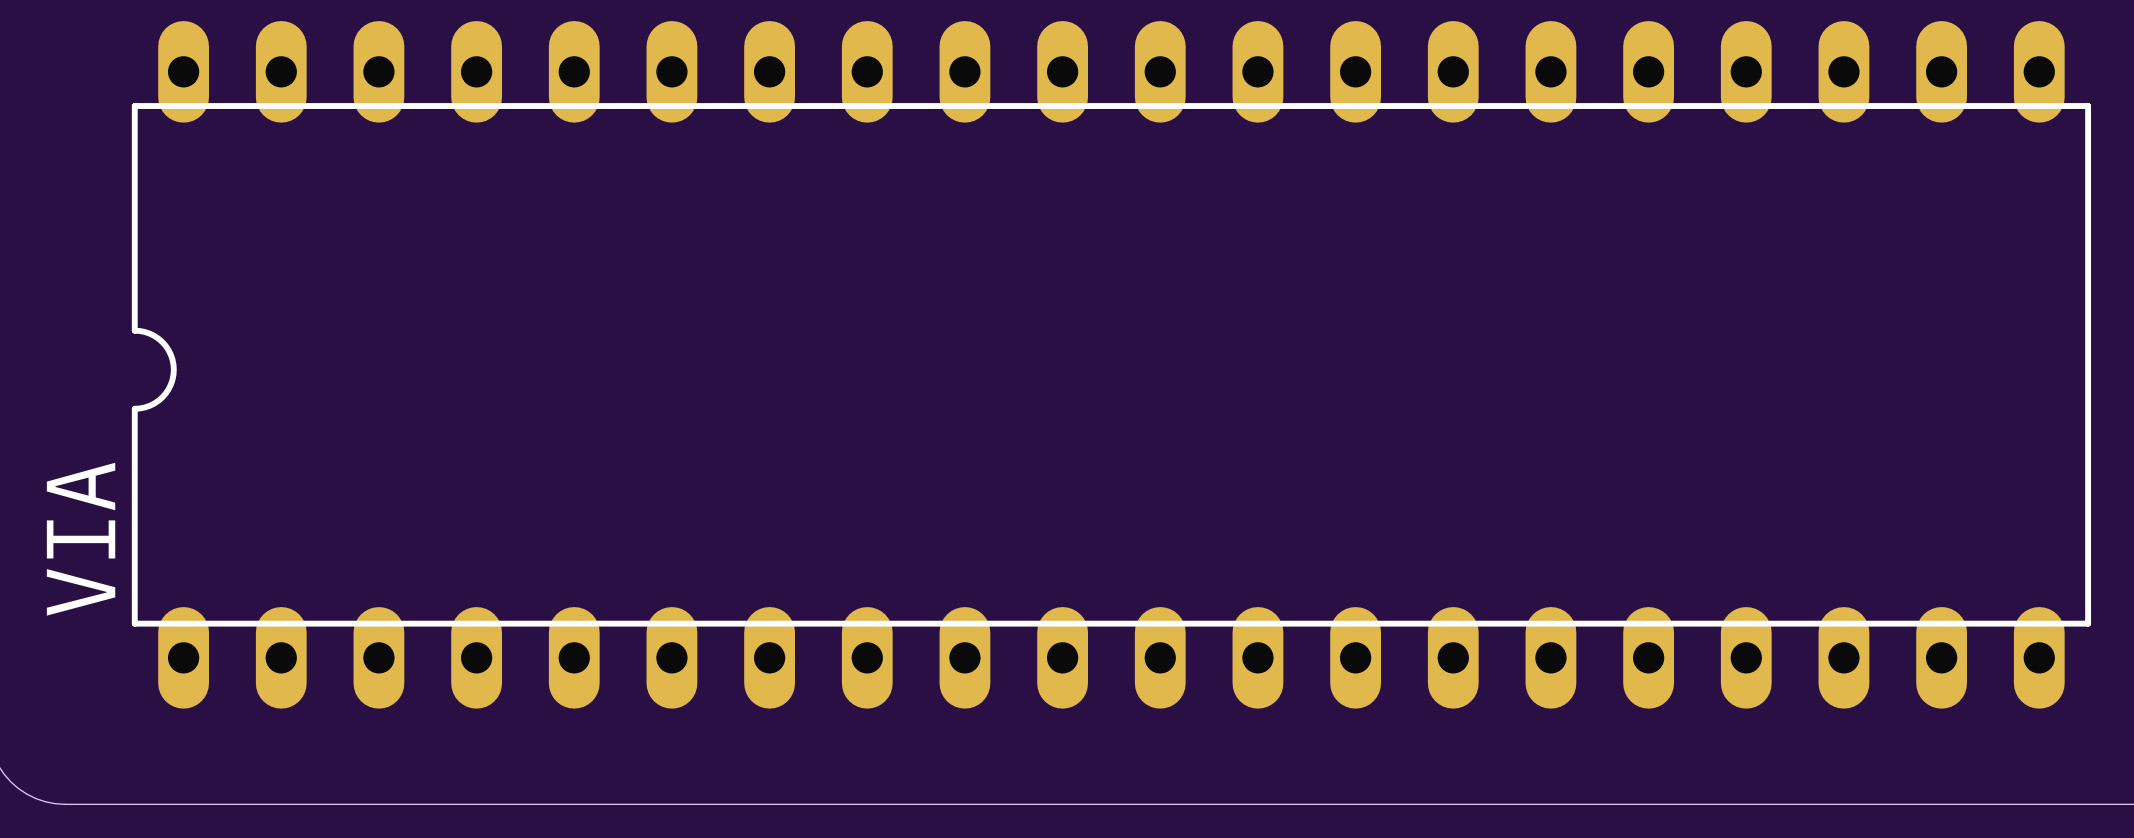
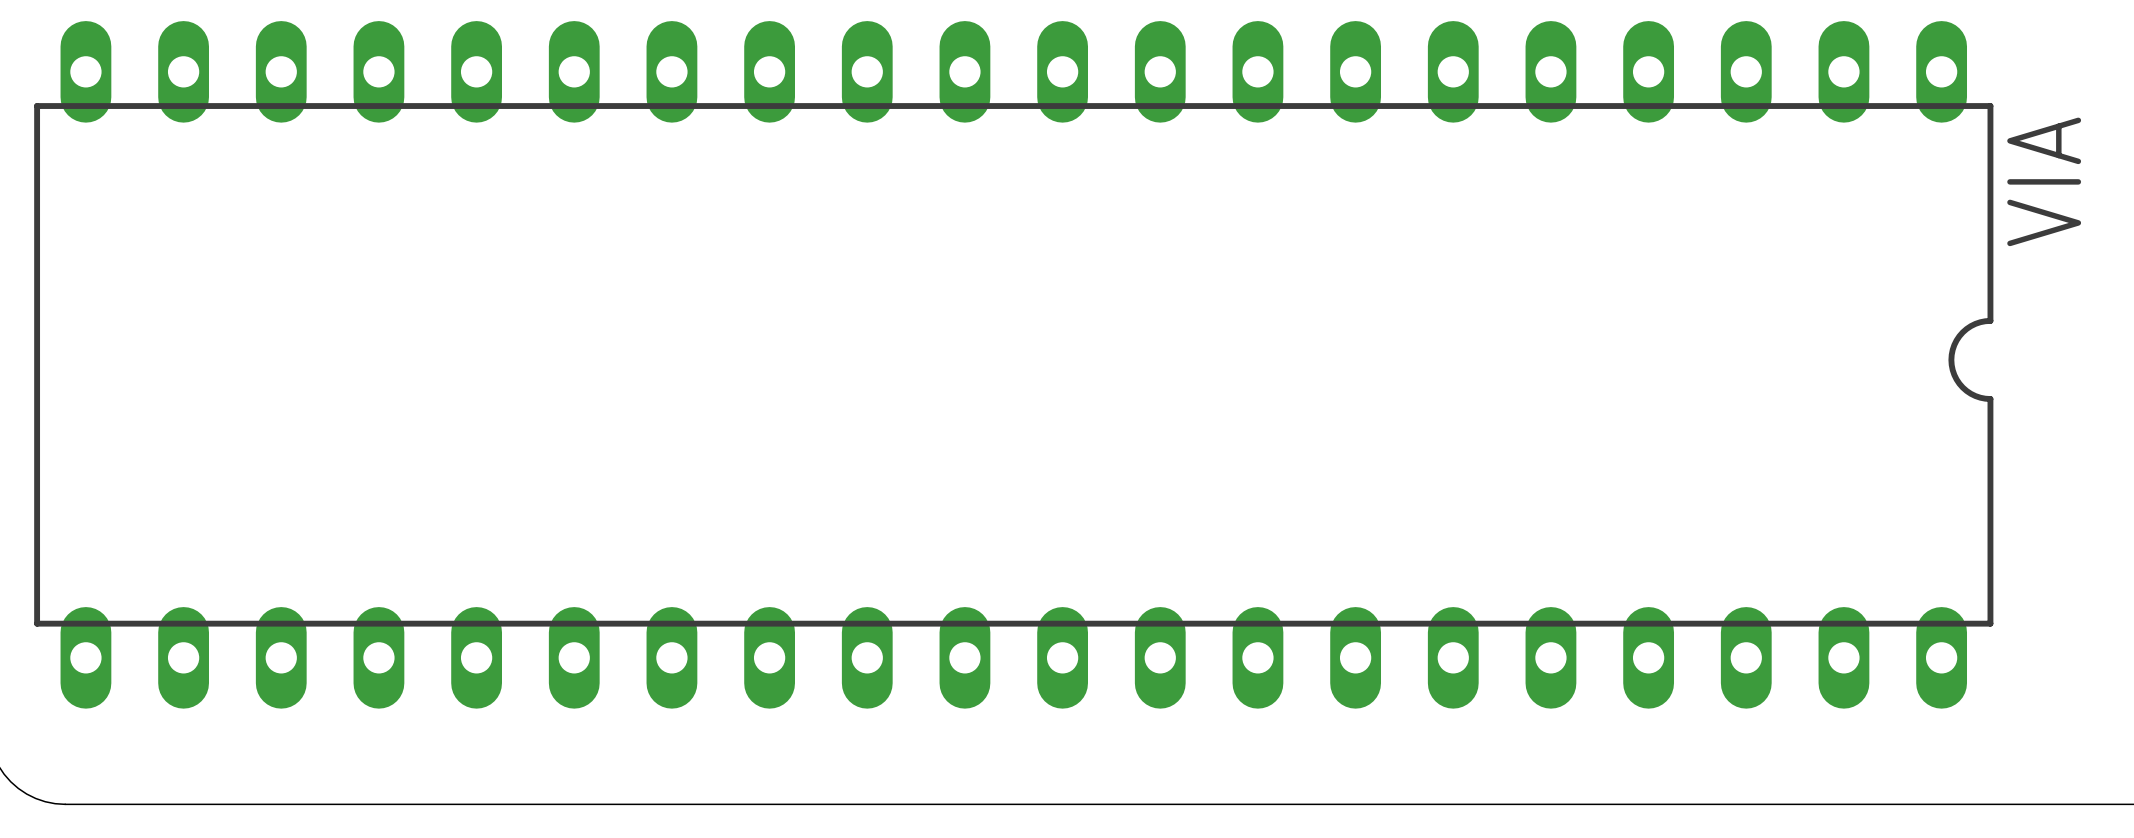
VIA rotation: 0° (1111, 364) -> 180° (1013, 364)

